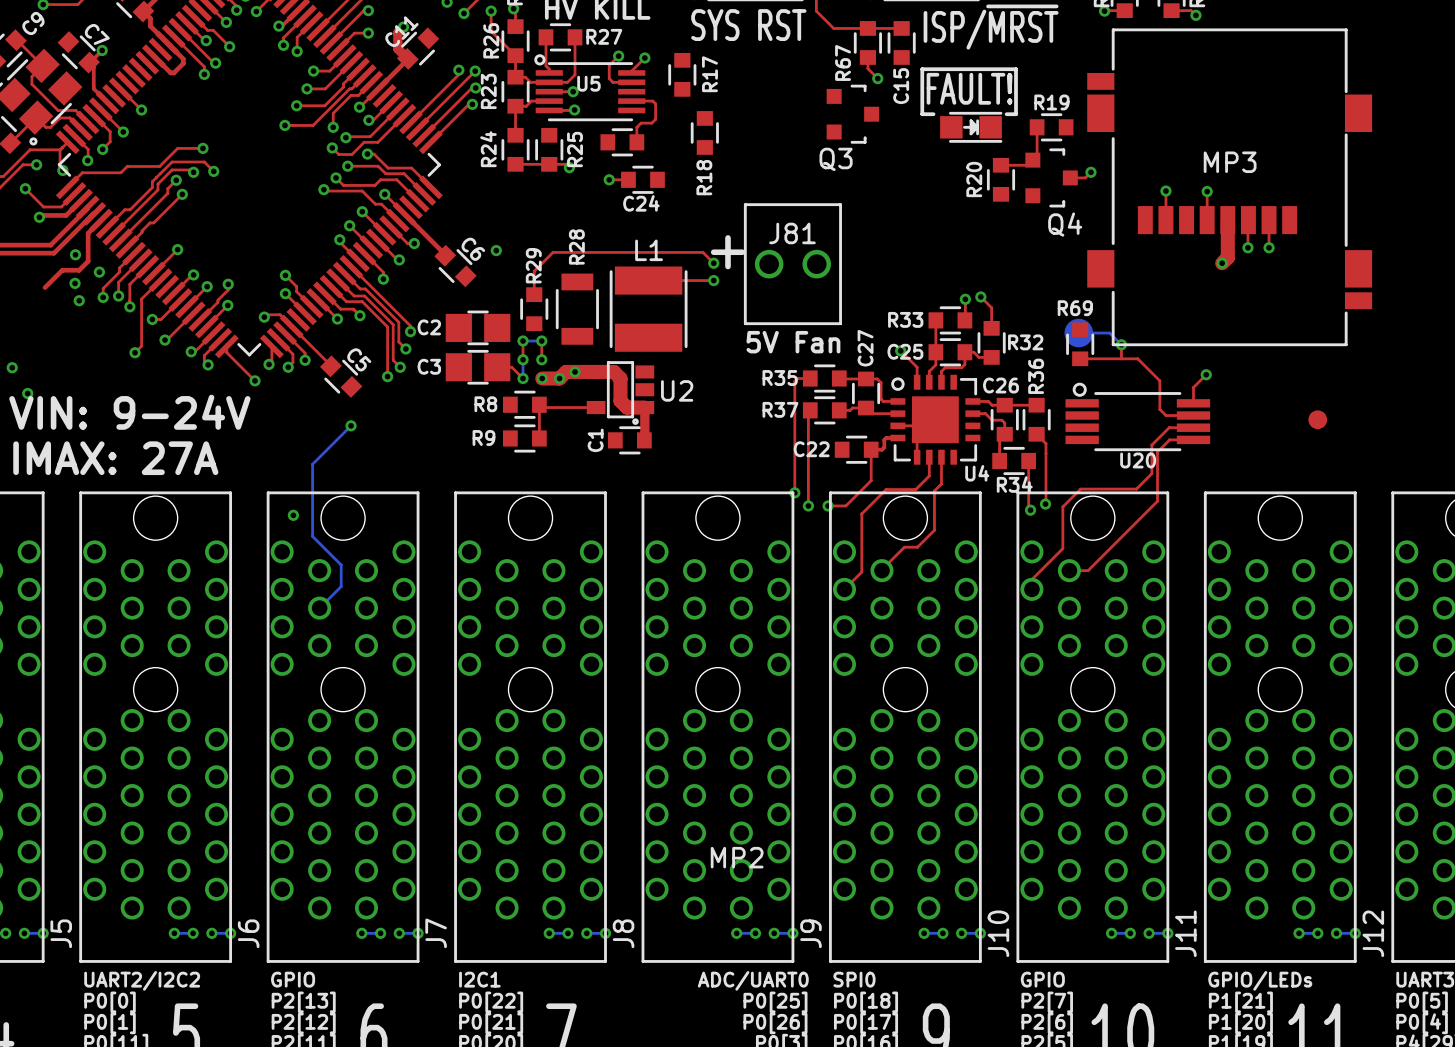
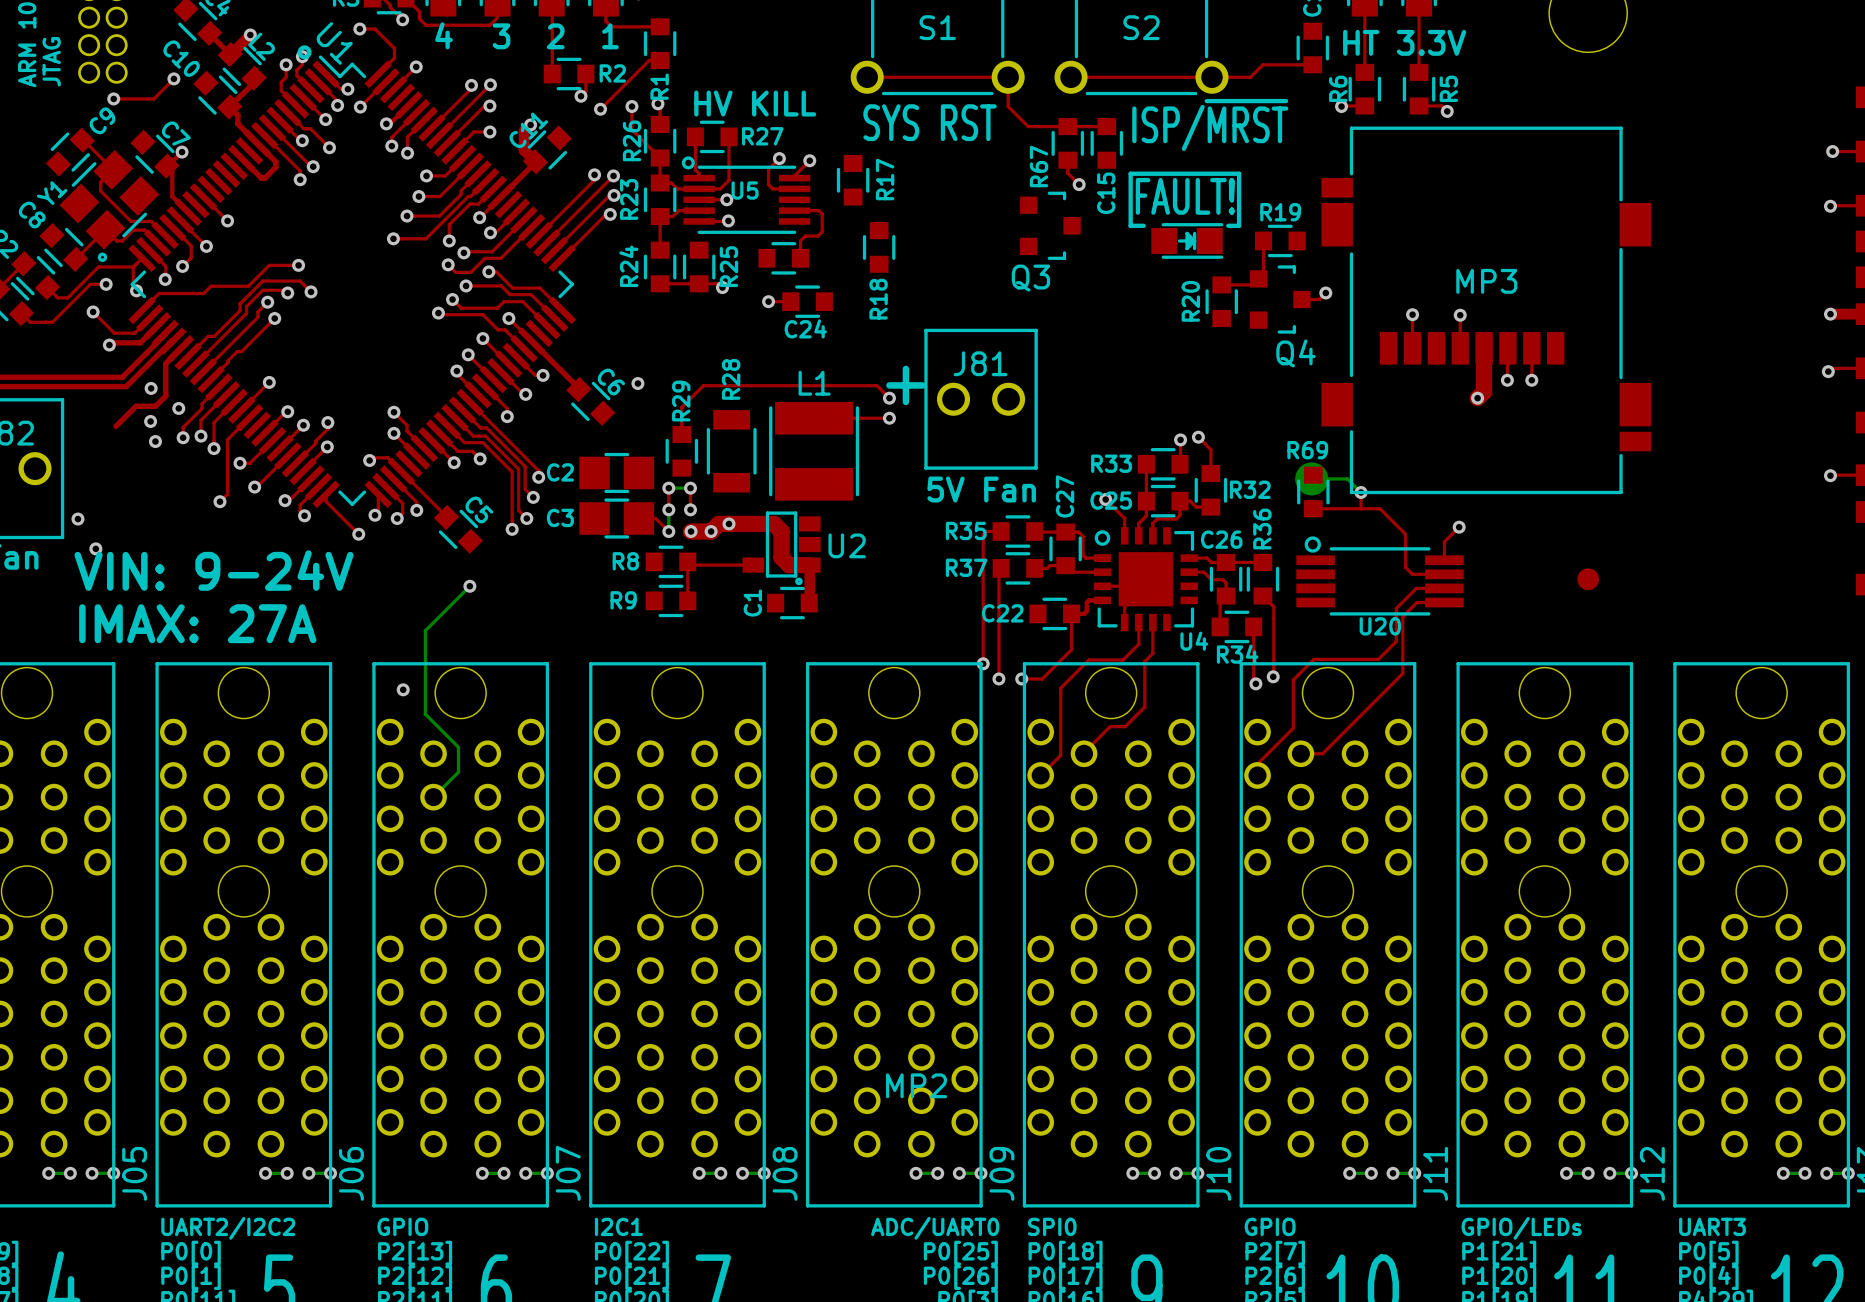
J5 name: J5 (61, 933) -> J05 (134, 1173)
J6 name: J6 (248, 933) -> J06 (351, 1173)
J7 name: J7 (436, 933) -> J07 (568, 1173)
J8 name: J8 (623, 933) -> J08 (785, 1173)
J9 name: J9 (810, 933) -> J09 (1001, 1173)

